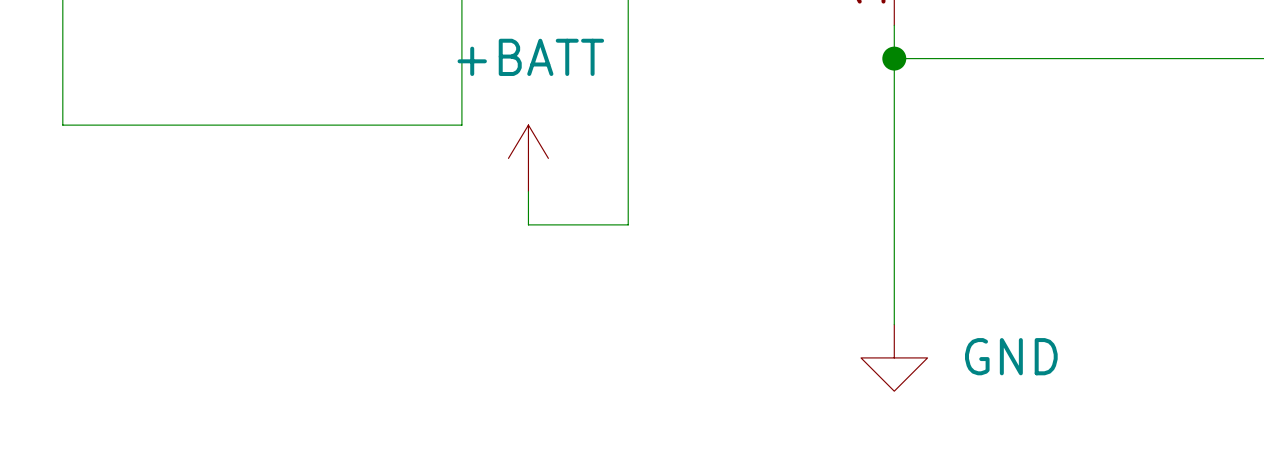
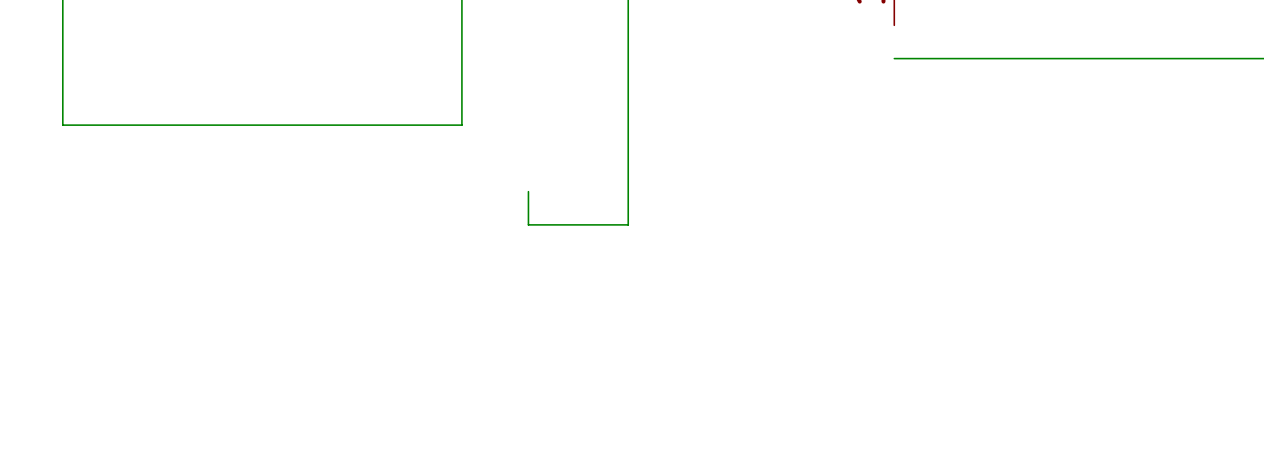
wire: (894, 25) (894, 324) -> none
junction: (894, 58) -> none
power symbol: +BATT (528, 158) -> none
power symbol: GND (894, 357) -> none

